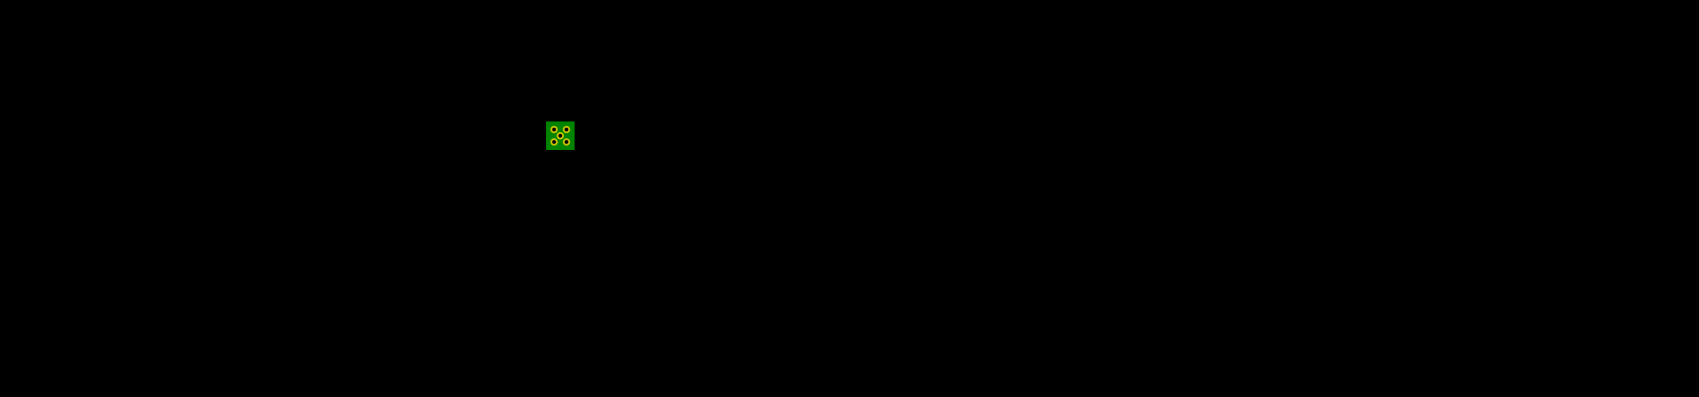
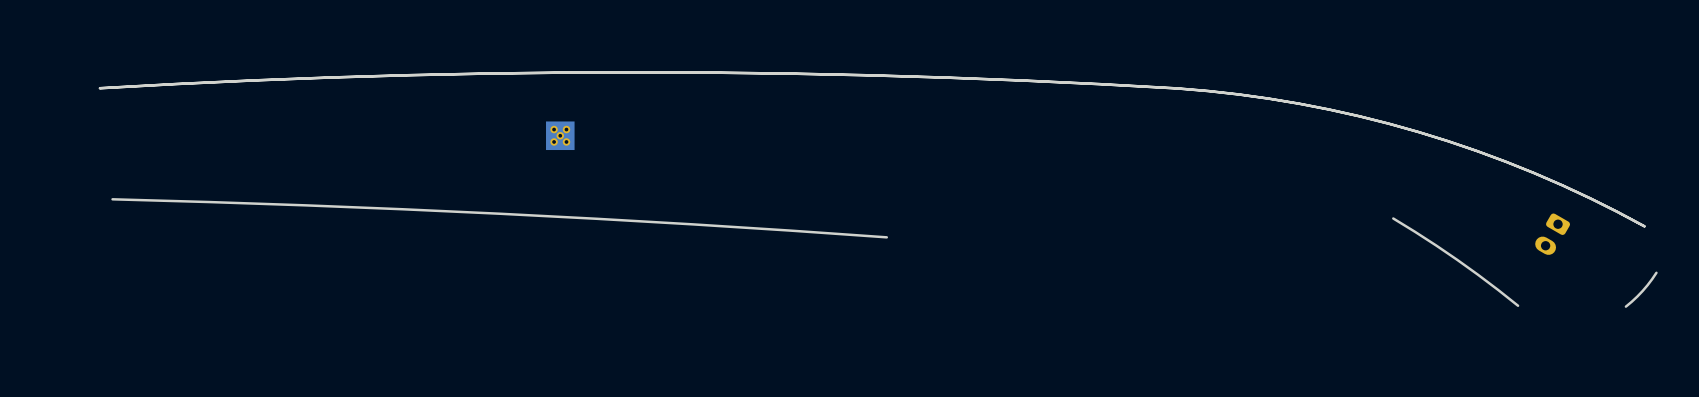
board edge: none -> (1177, 88) (869, 75) (638, 72) (330, 77) (99, 88) (253, 80) (330, 77) (484, 73) (638, 72) (792, 73) (869, 75) (1023, 80) (1177, 88)
board edge: none -> (1177, 88) (1238, 94) (1299, 103) (1359, 116) (1418, 132) (1476, 151) (1534, 173) (1590, 198) (1644, 226) (1617, 211) (1590, 198) (1562, 185) (1534, 173) (1505, 161) (1476, 151) (1447, 141) (1418, 132) (1389, 123) (1359, 116) (1329, 109) (1299, 103) (1269, 98) (1238, 94) (1208, 91) (1177, 88)
board edge: none -> (112, 199) (499, 213) (886, 237)
board edge: none -> (1393, 218) (1457, 259) (1518, 305)
part: none -> (1552, 234)
board edge: none -> (1656, 272) (1642, 291) (1625, 306)

